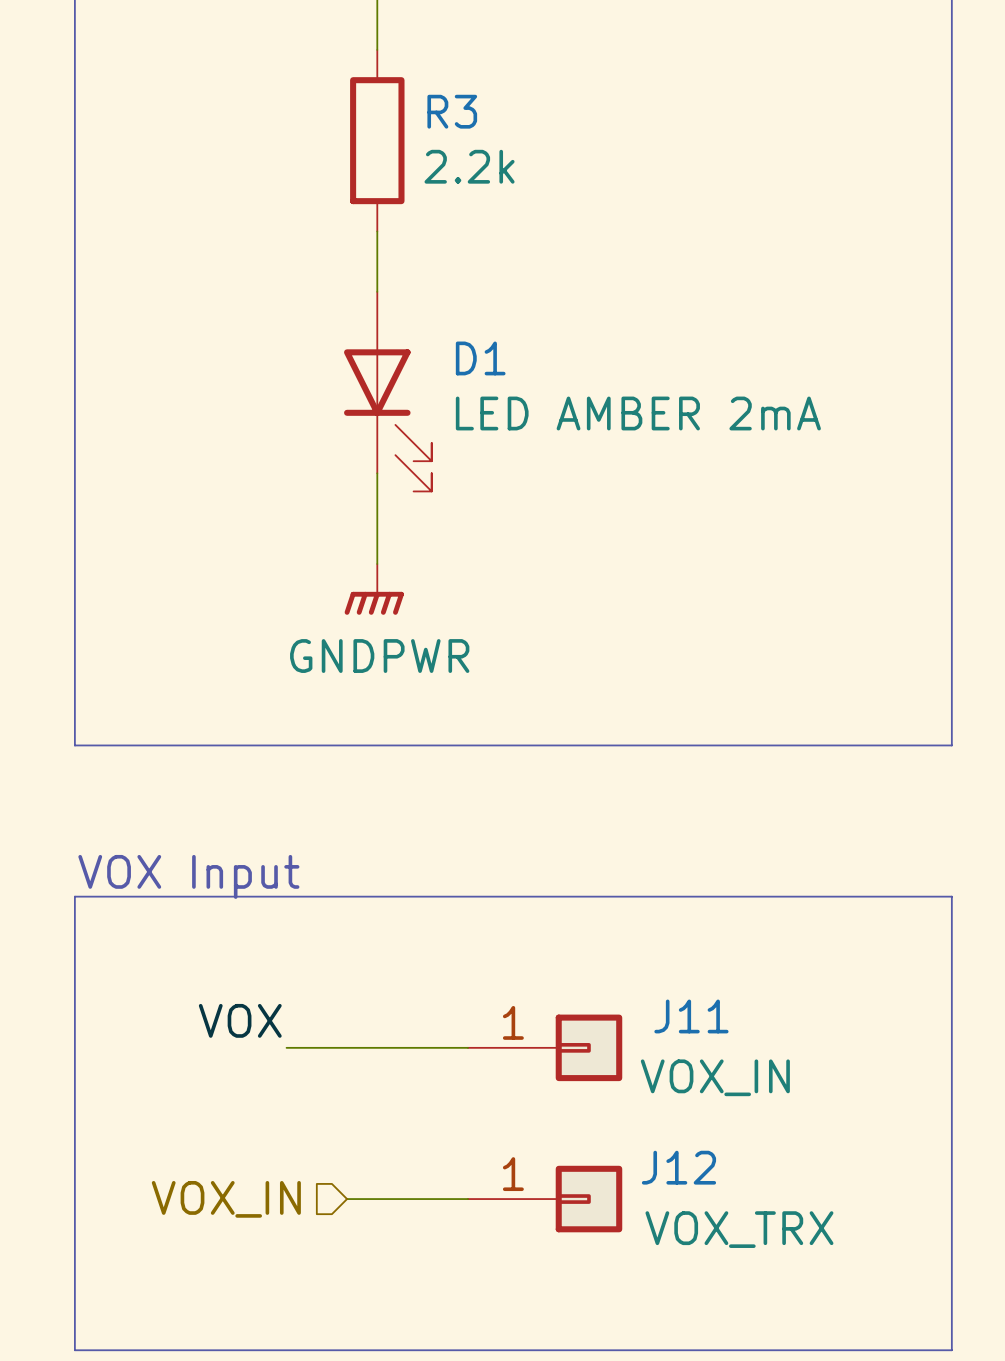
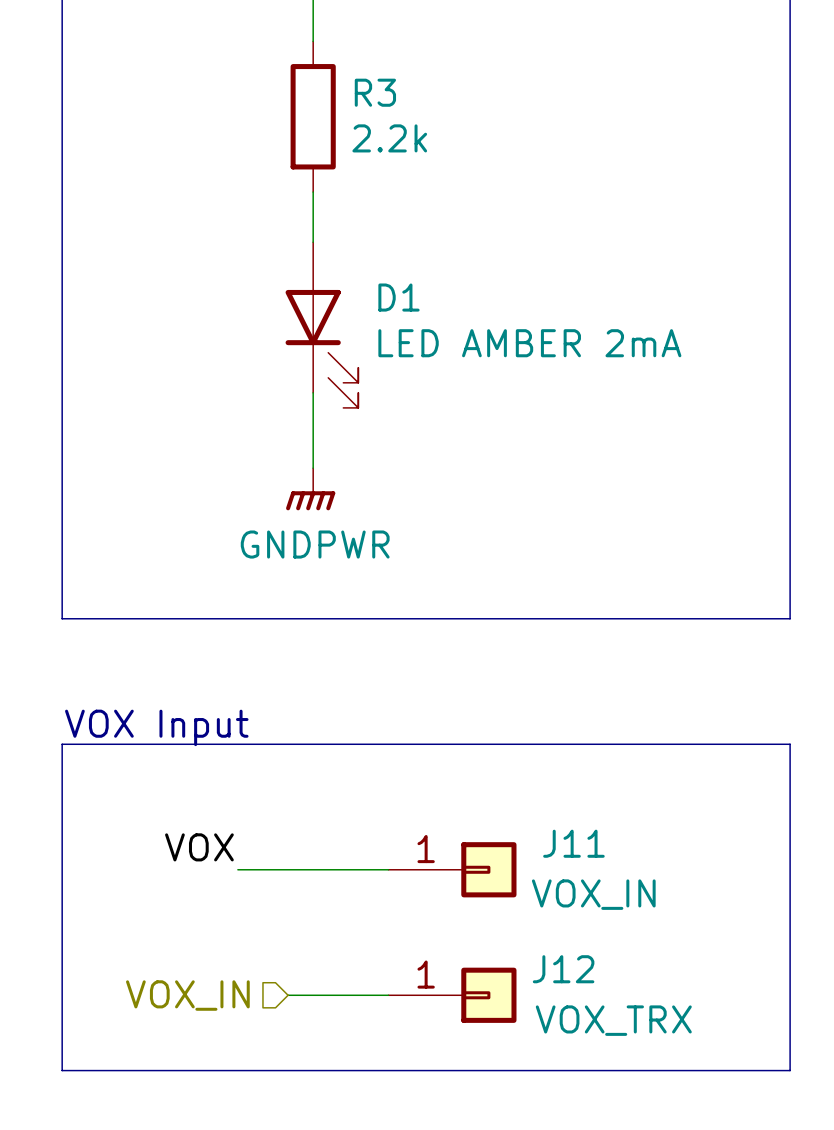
line: (74, 1289) (74, 1350) (951, 1350) (951, 1289) -> (62, 1070) (790, 1070)

